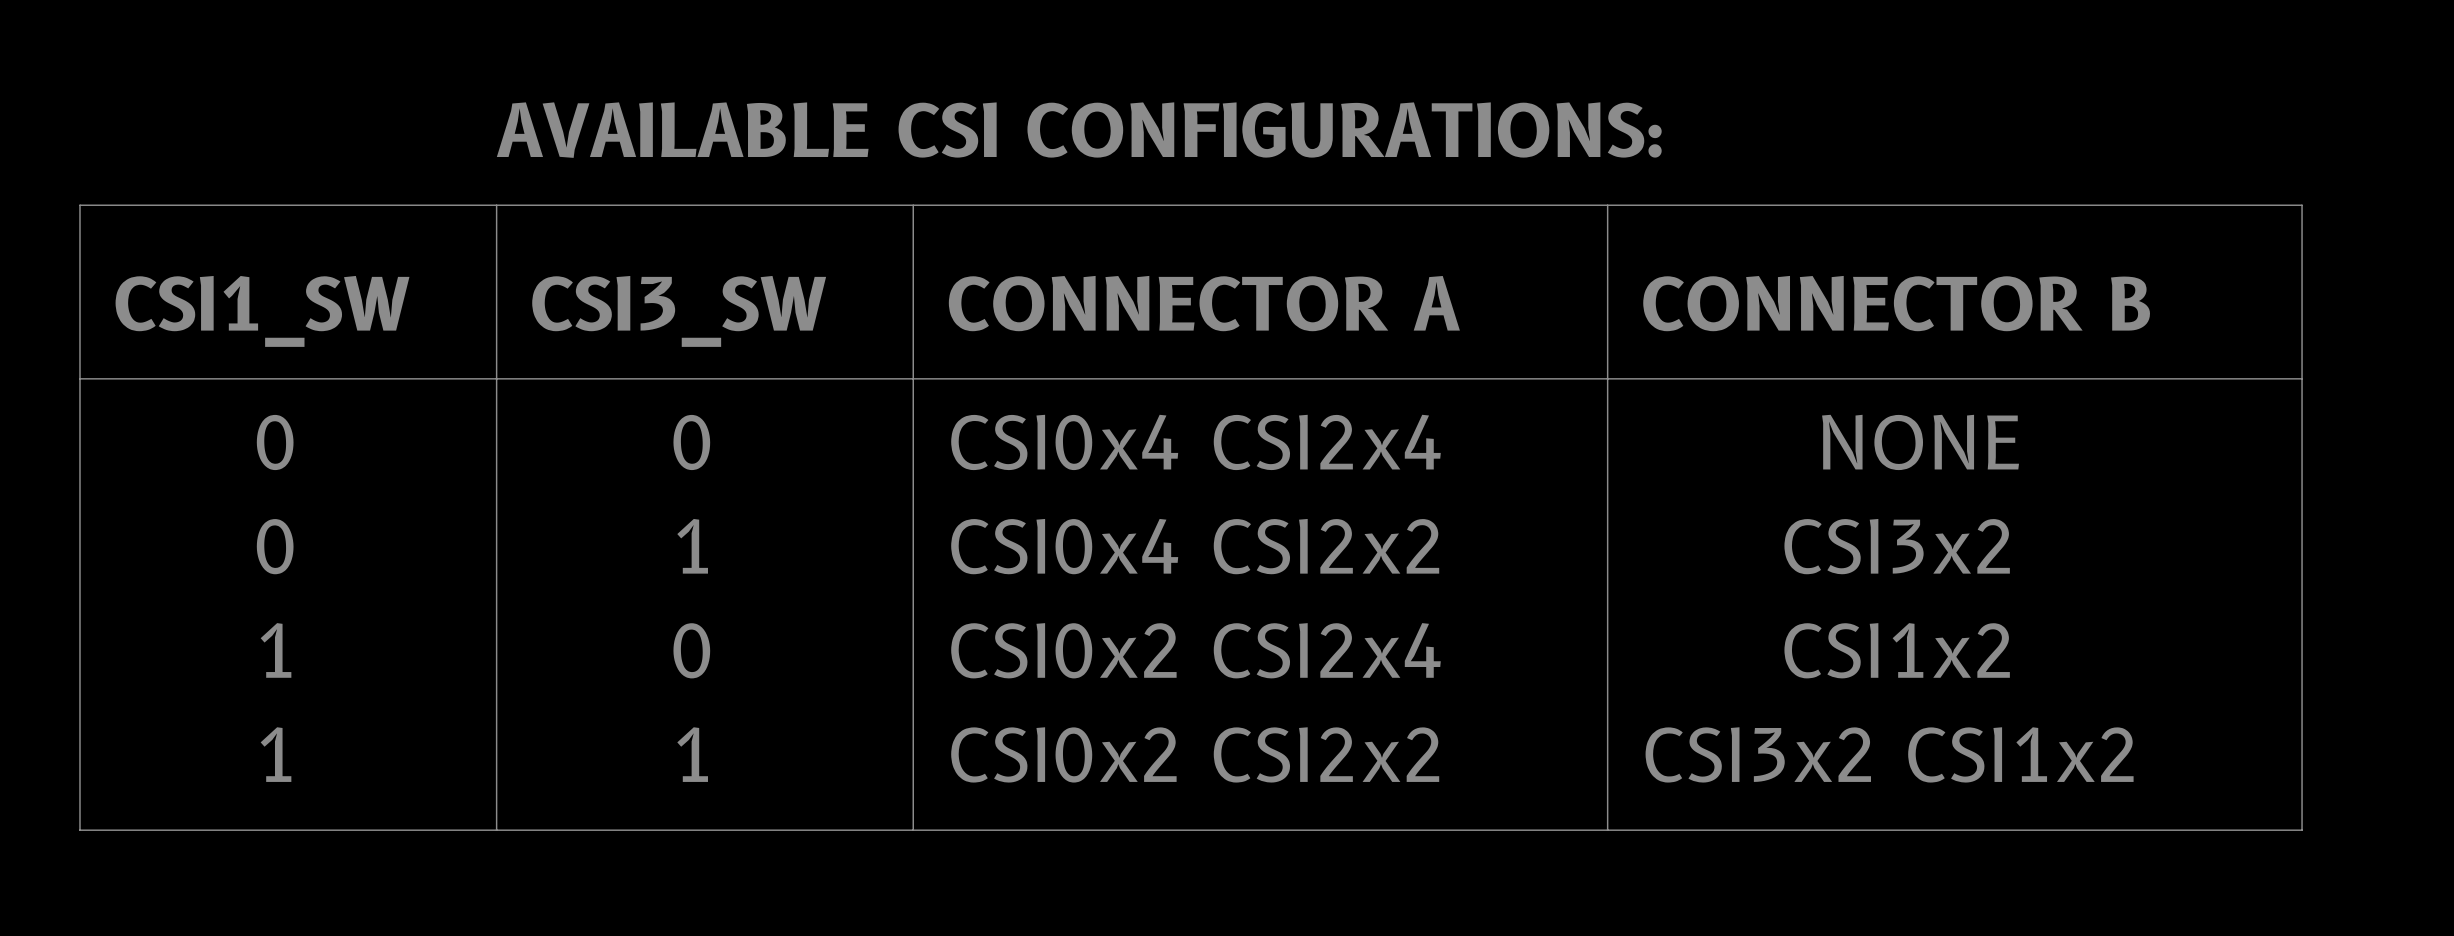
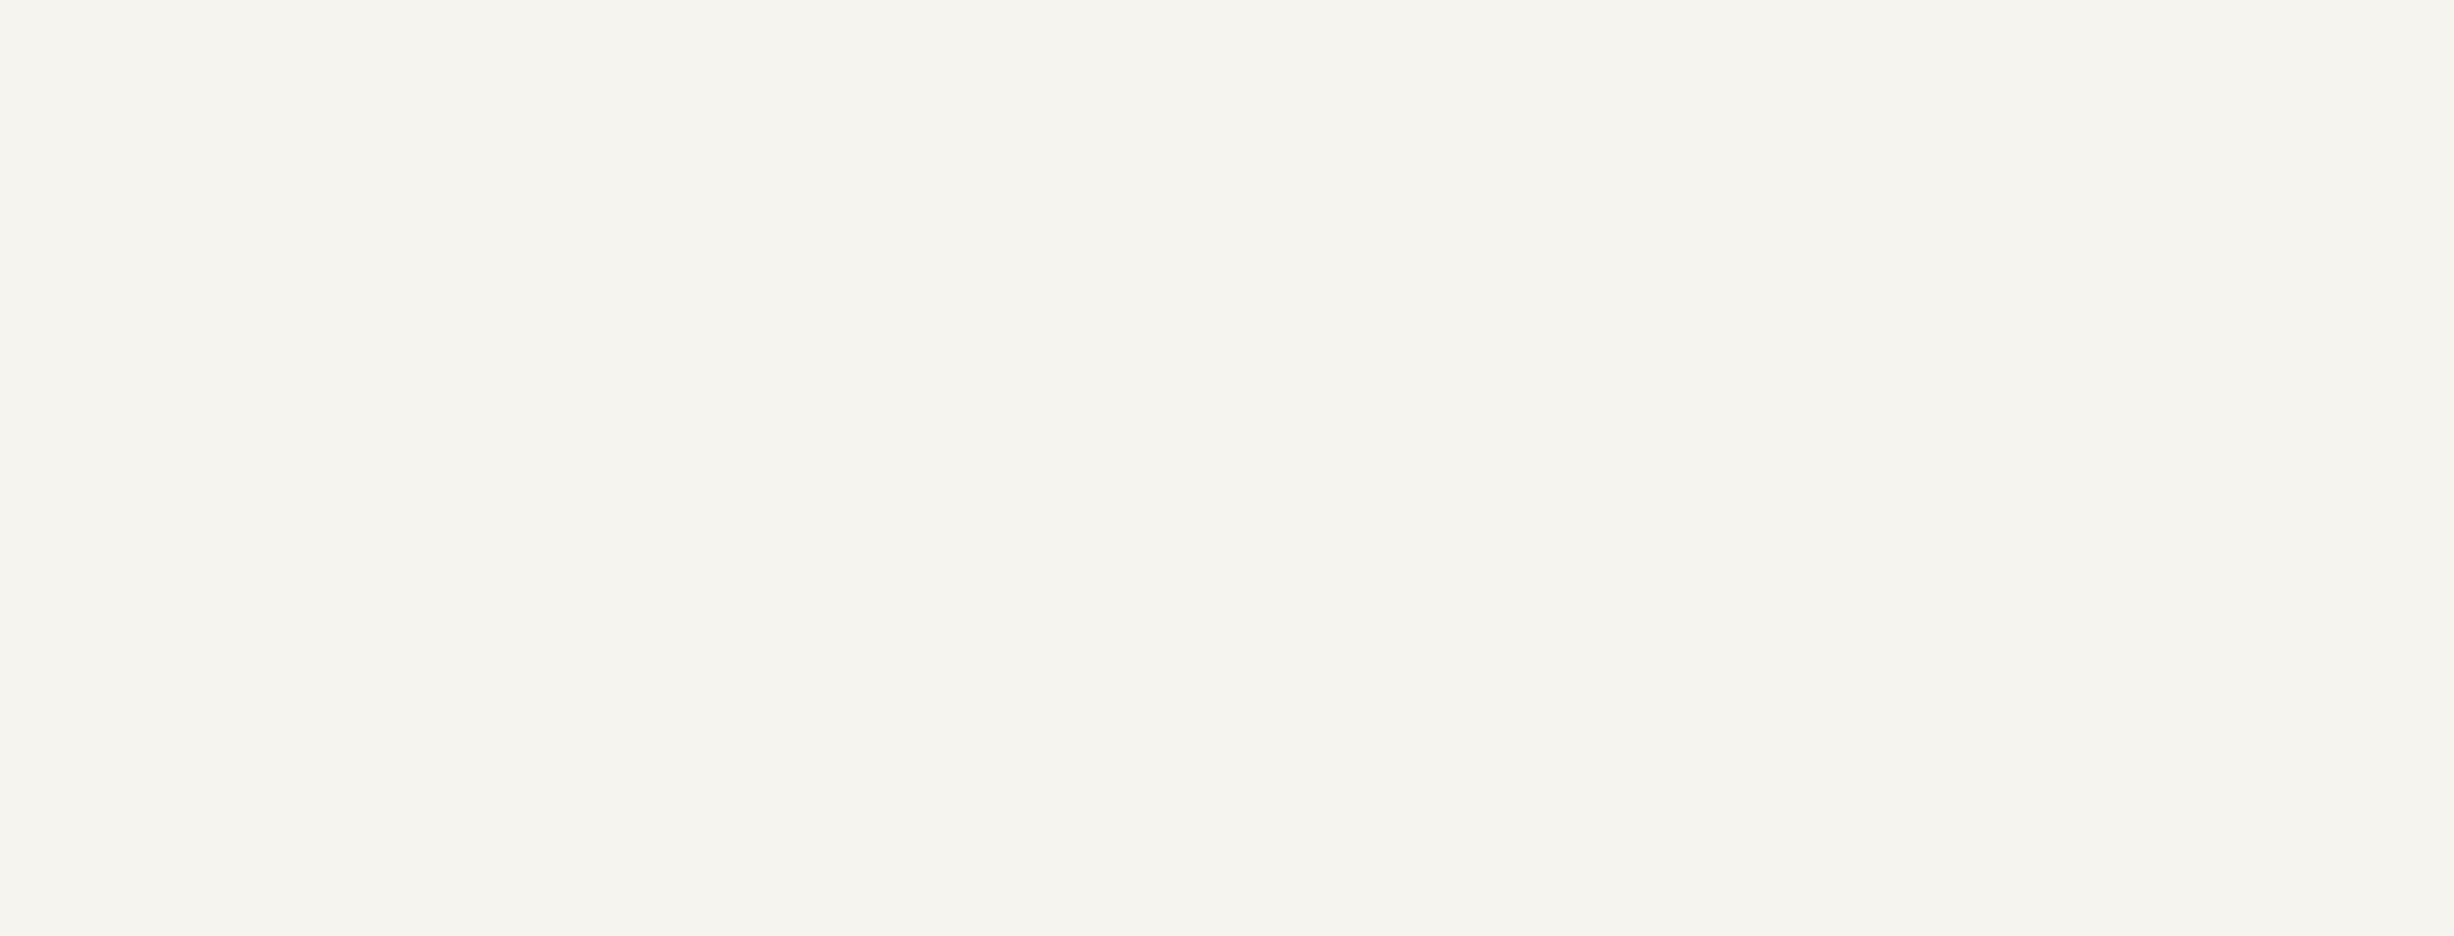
text: AVAILABLE CSI CONFIGURATIONS: (1079, 130) -> none
line: (79, 205) (2302, 205) (2302, 830) (79, 830) (79, 205) -> none
line: (496, 205) (496, 830) -> none
line: (913, 205) (913, 830) -> none
line: (1607, 205) (1607, 830) -> none
text: CONNECTOR A (1204, 303) -> none
text: CONNECTOR B (1896, 303) -> none
text: CSI1_SW (262, 311) -> none
text: CSI3_SW (679, 311) -> none
line: (79, 378) (2302, 378) -> none
text: 0 (275, 442) -> none
text: 0 (691, 442) -> none
text: CSI0x4 CSI2x4 (1195, 442) -> none
text: NONE (1920, 442) -> none
text: 0 (275, 546) -> none
text: 1 (692, 546) -> none
text: CSI0x4 CSI2x2 (1195, 546) -> none
text: CSI3x2 (1897, 546) -> none
text: 1 (276, 650) -> none
text: 0 (691, 650) -> none
text: CSI0x2 CSI2x4 (1195, 650) -> none
text: CSI1x2 (1897, 650) -> none
text: 1 (276, 754) -> none
text: 1 (692, 754) -> none
text: CSI0x2 CSI2x2 (1195, 754) -> none
text: CSI3x2 CSI1x2 (1889, 754) -> none

